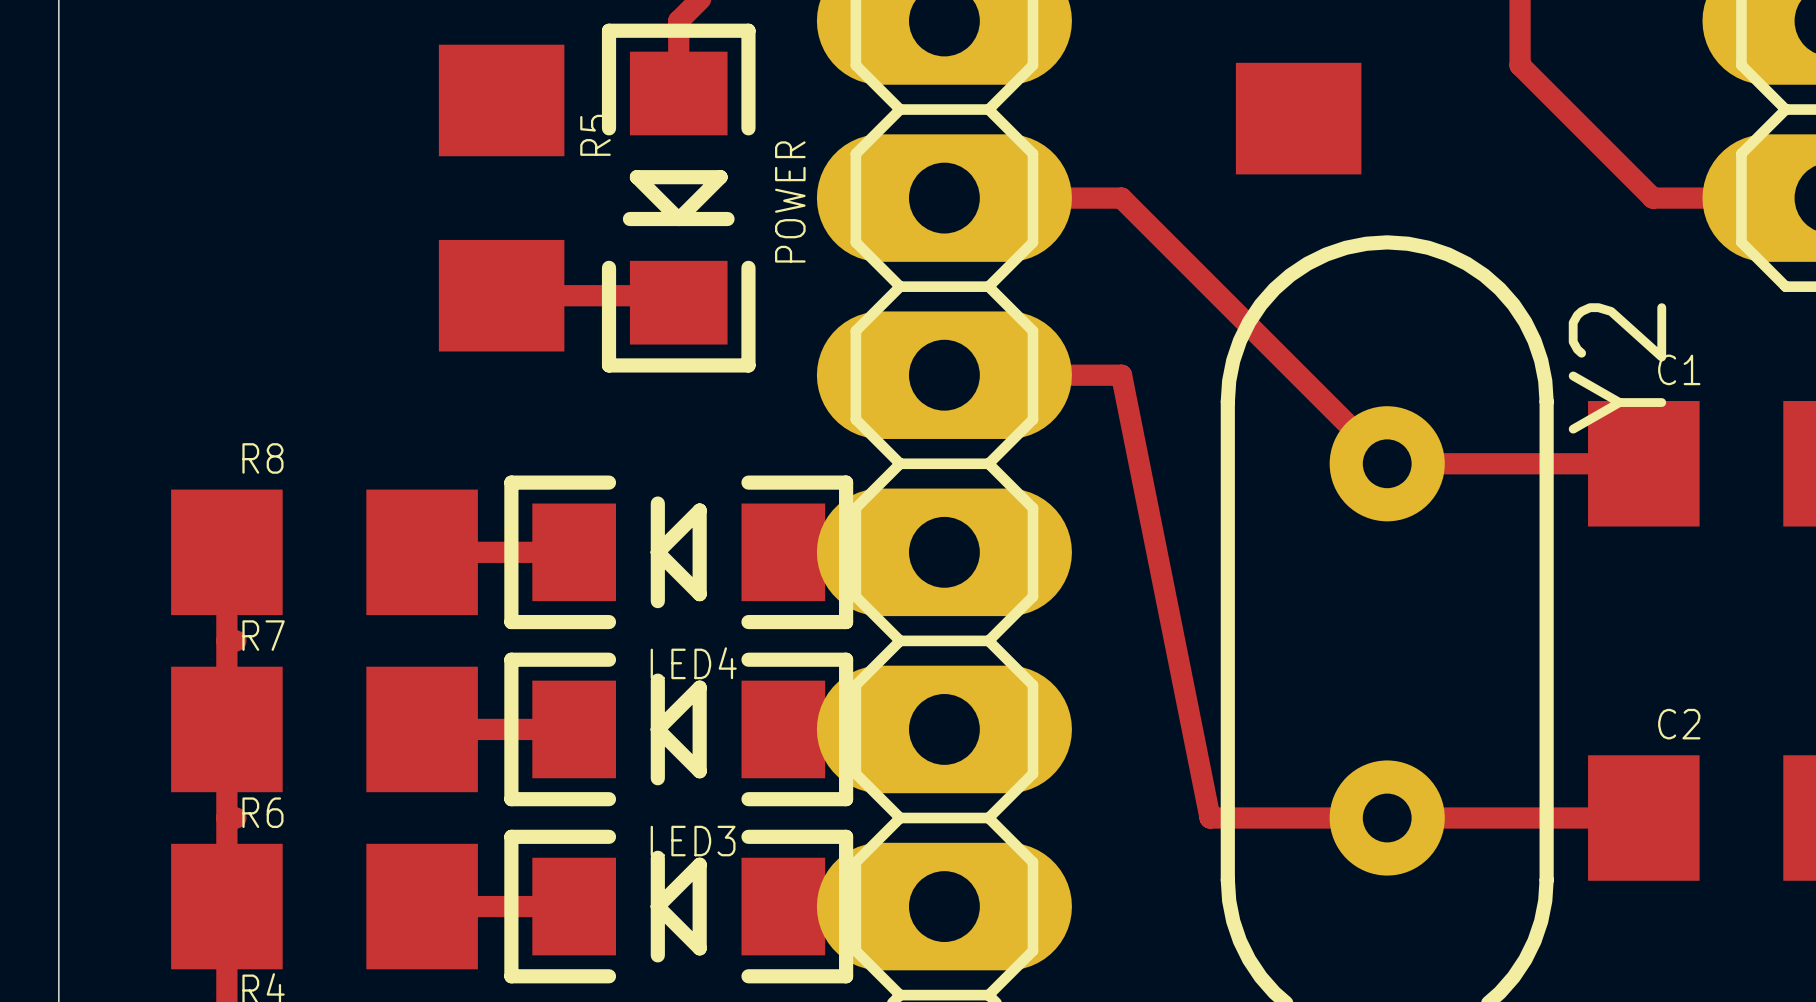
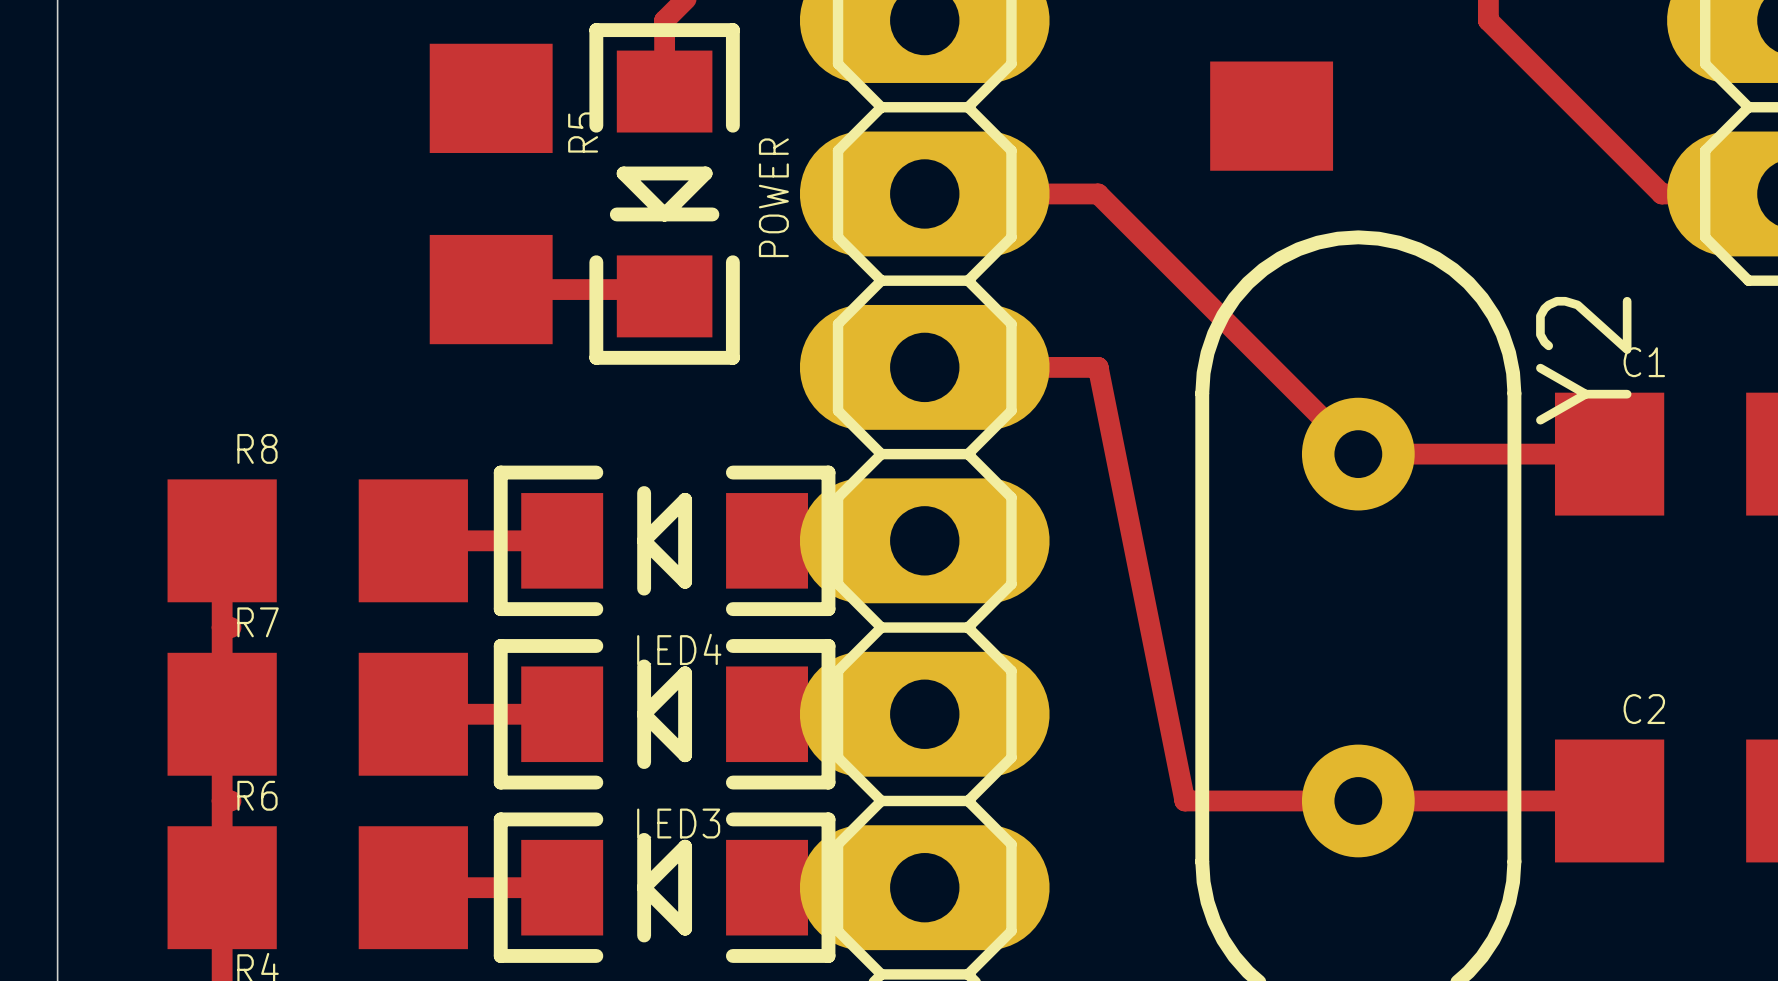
track: (1520, 20) (1520, 65) (1652, 198) (1697, 198) -> (1488, 20) (1661, 193)

